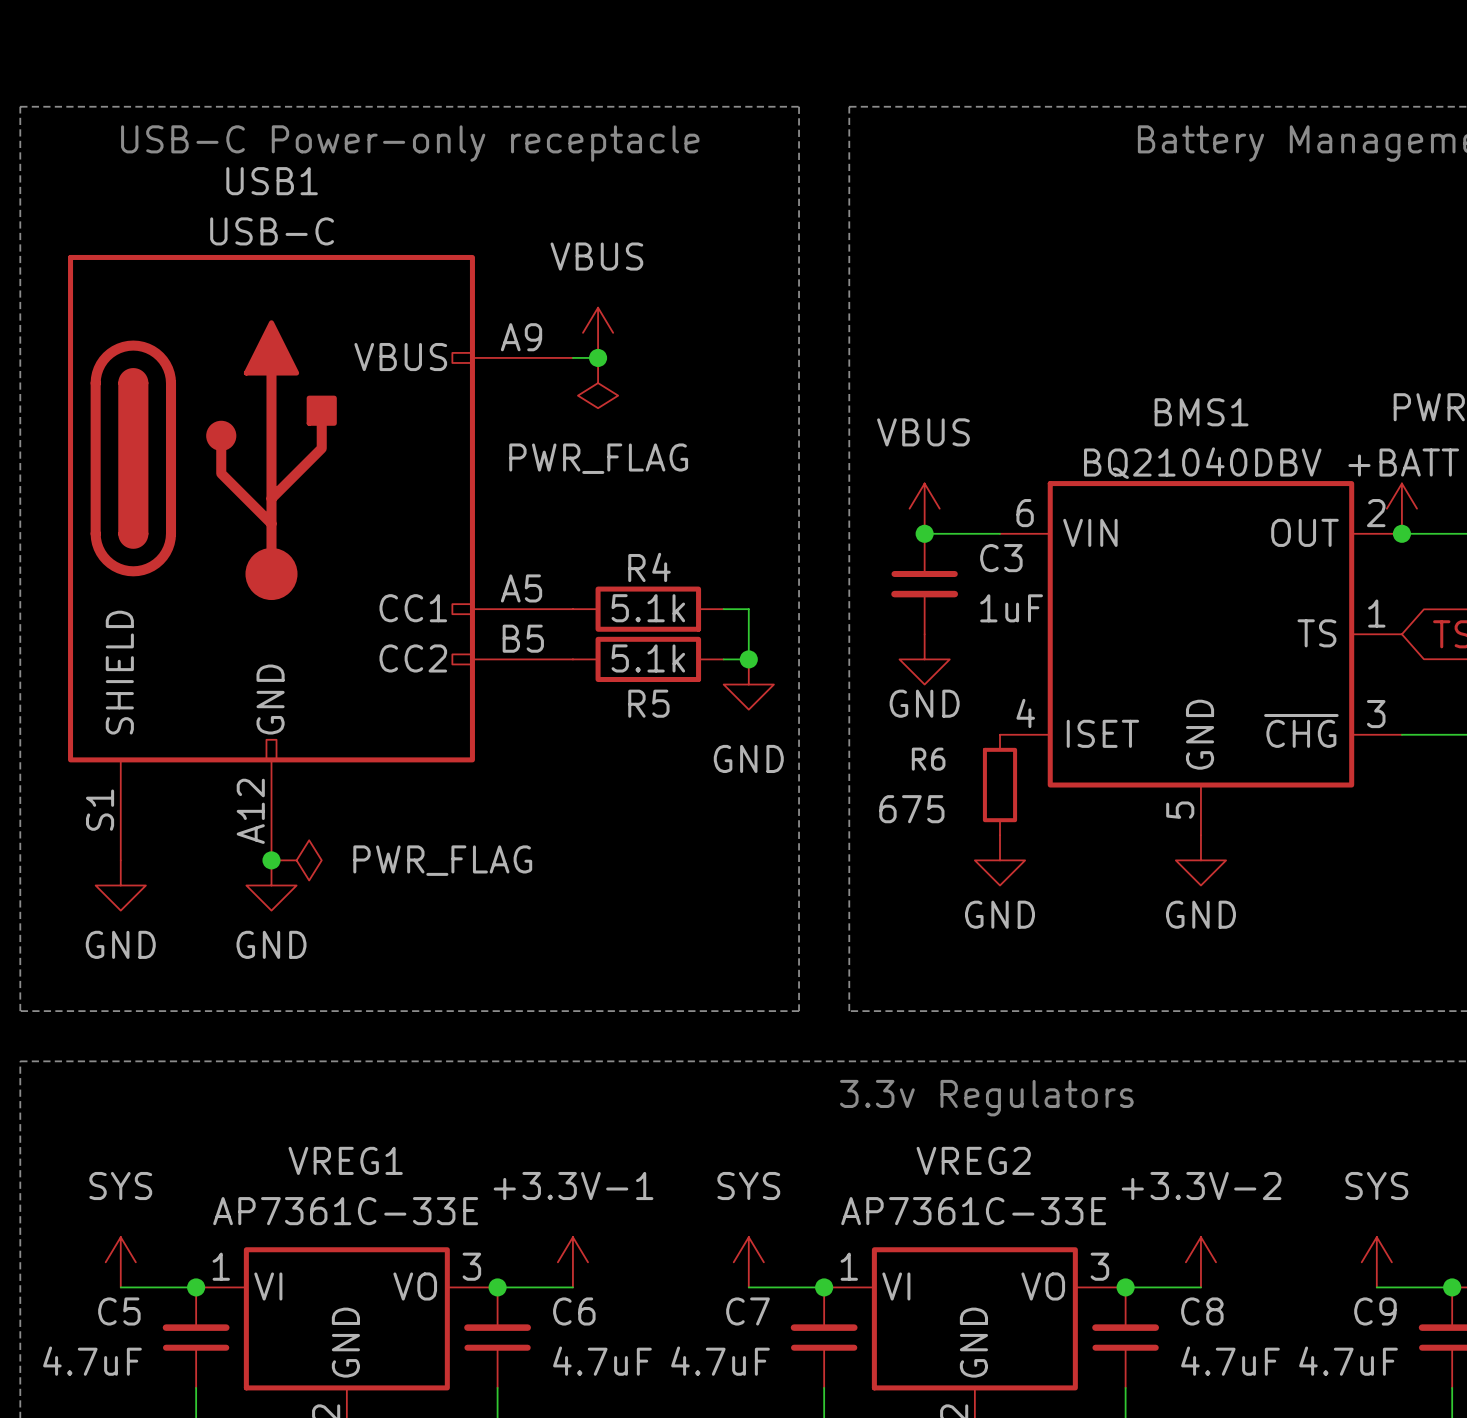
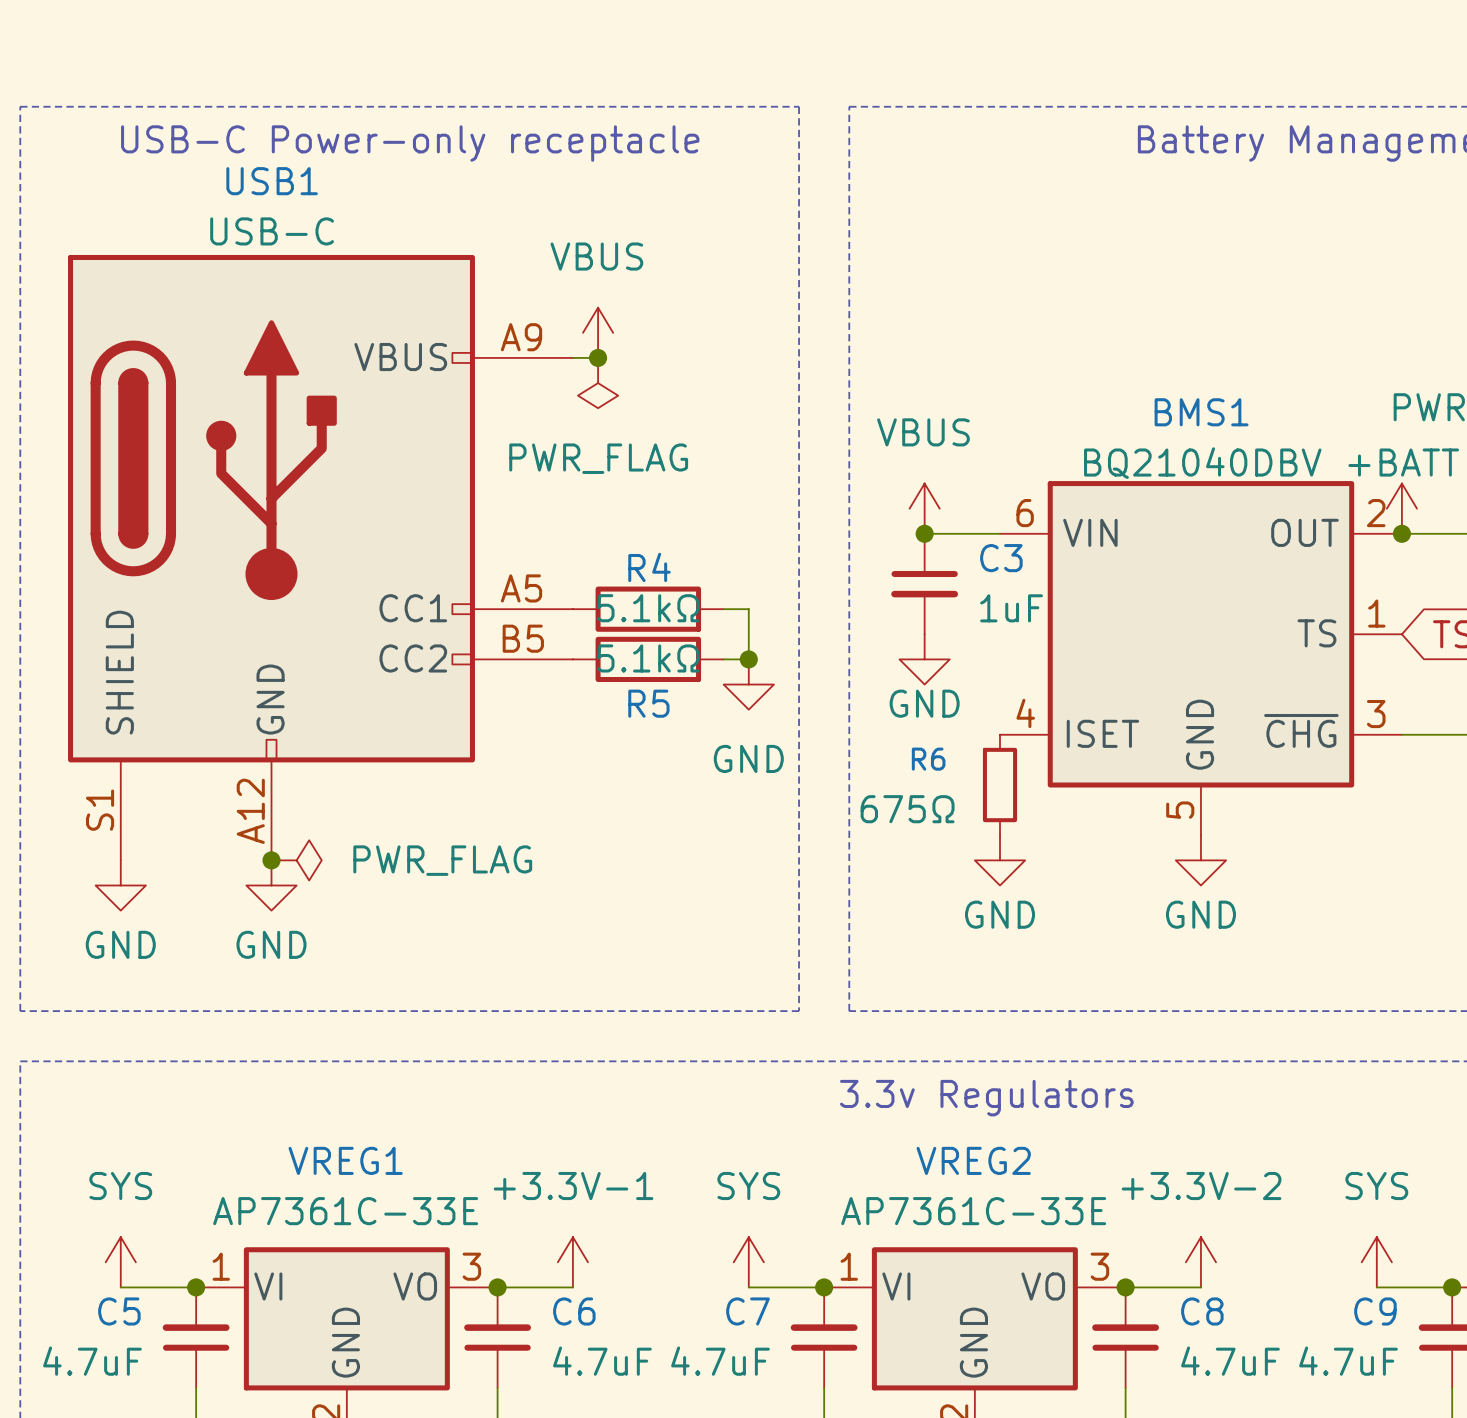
R4 value: 5.1k (648, 608) -> 5.1kΩ (648, 608)
R5 value: 5.1k (648, 658) -> 5.1kΩ (648, 658)
R6 value: 675 (911, 809) -> 675Ω (907, 809)

